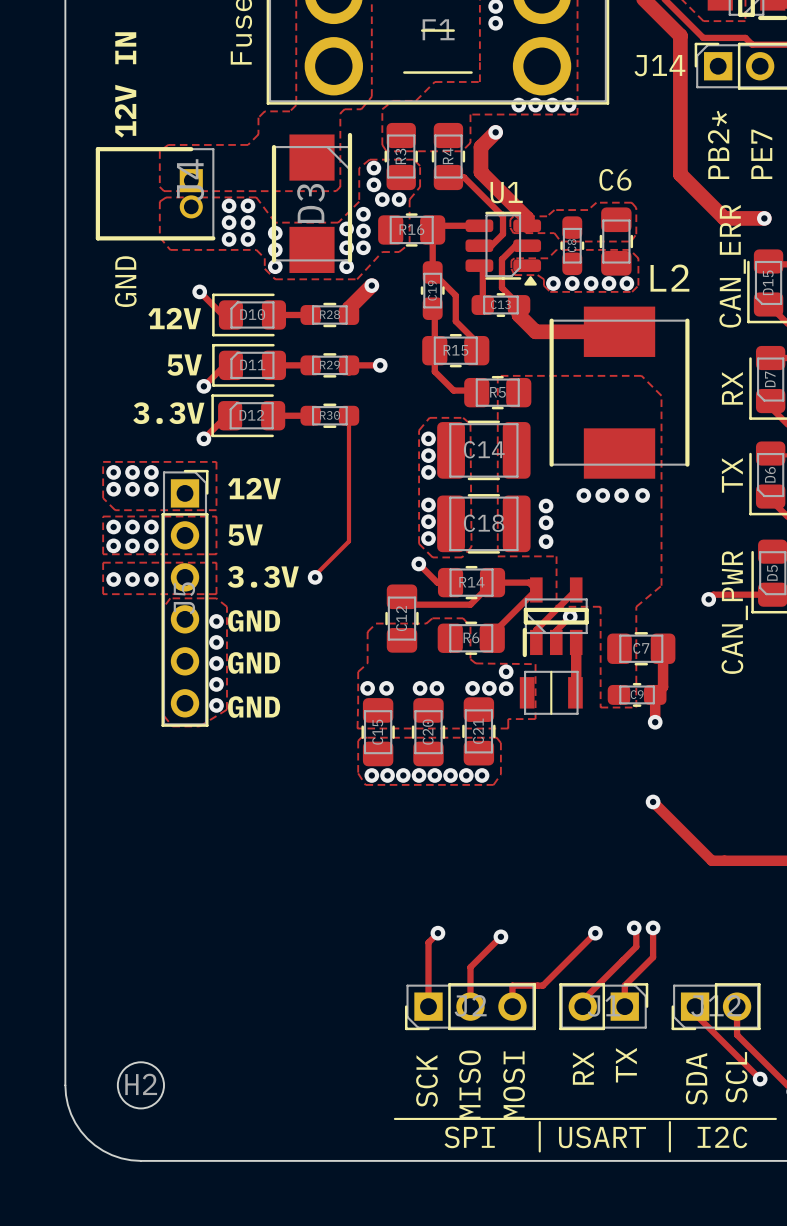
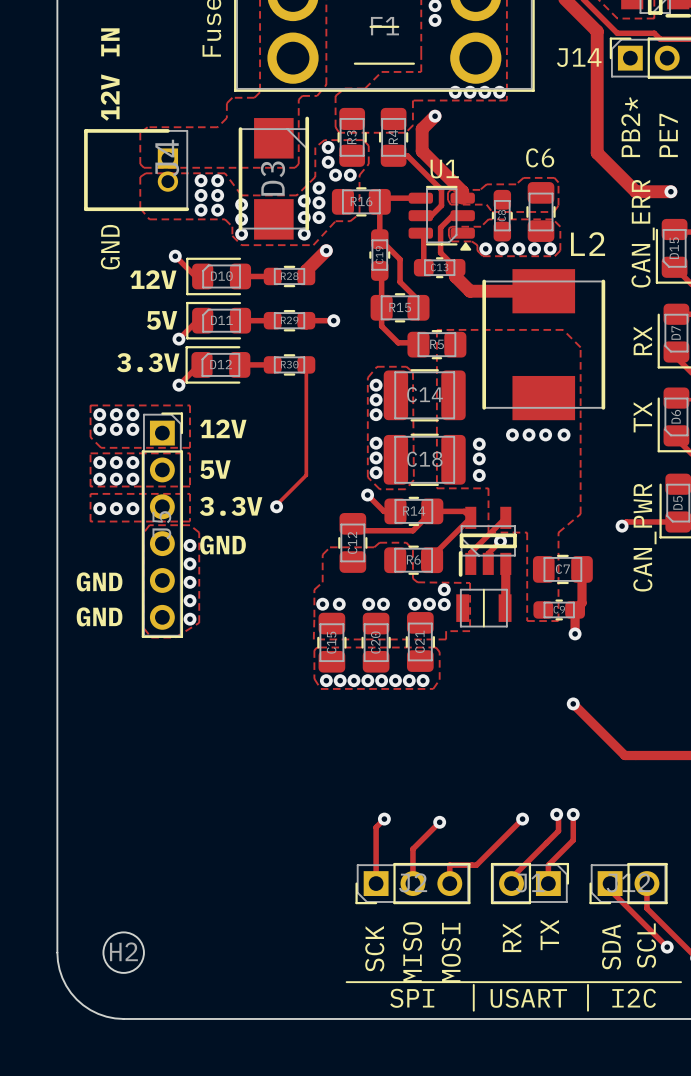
text: none -> GND (99, 581)
text: GND (254, 662) -> none
text: none -> GND (99, 616)
text: GND (254, 707) -> none

